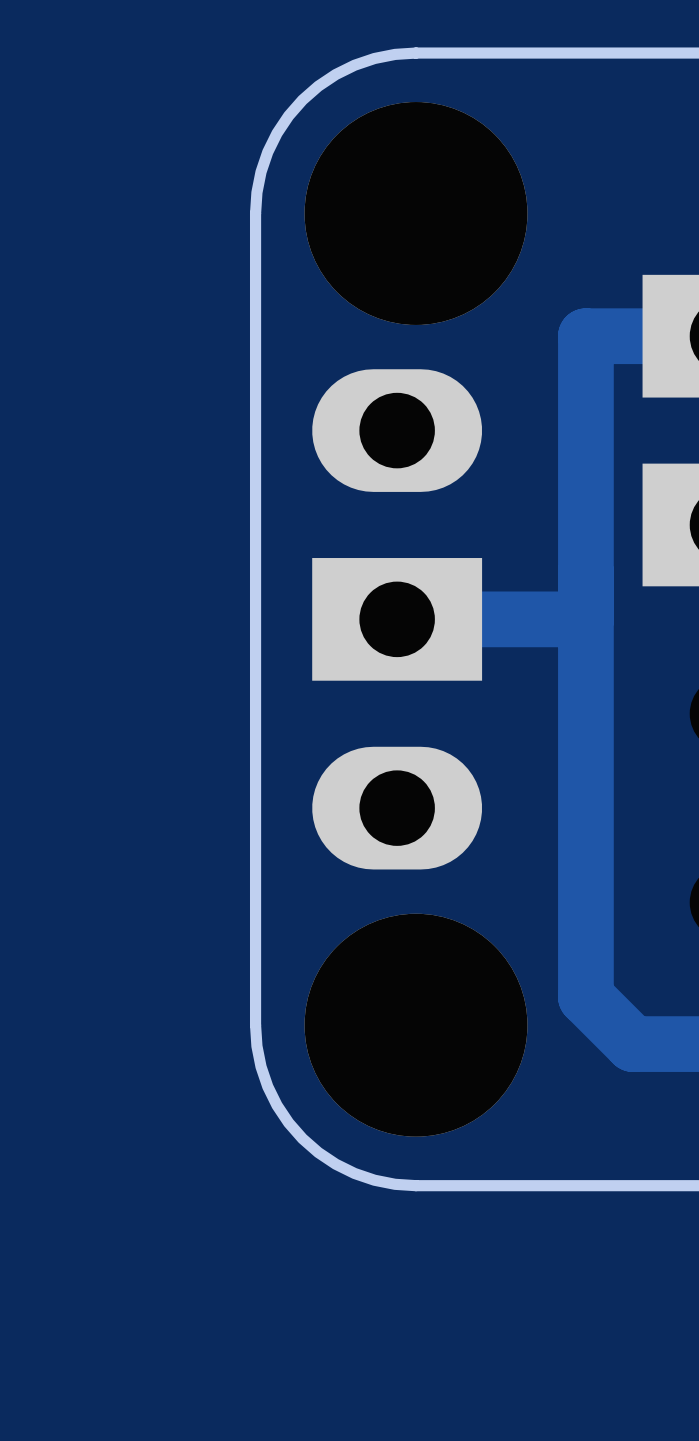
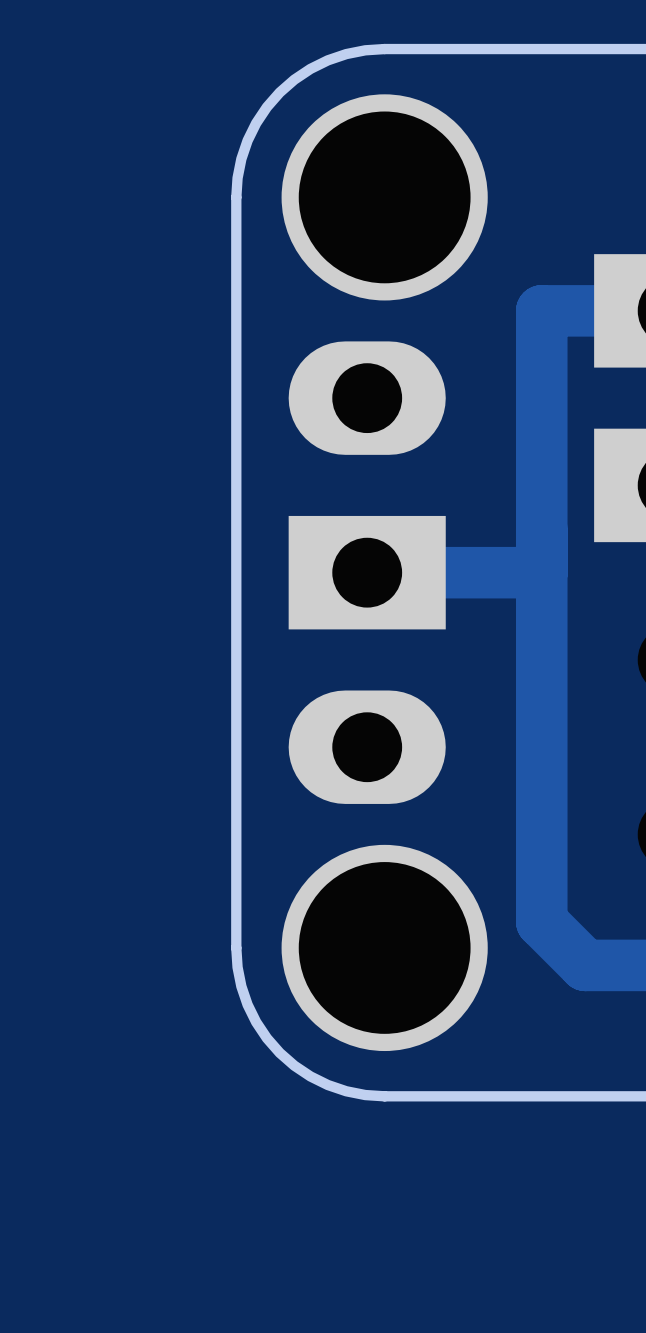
part footprint: [304, 102, 528, 325] -> [281, 94, 488, 301]
part footprint: [304, 913, 528, 1137] -> [281, 844, 488, 1052]

